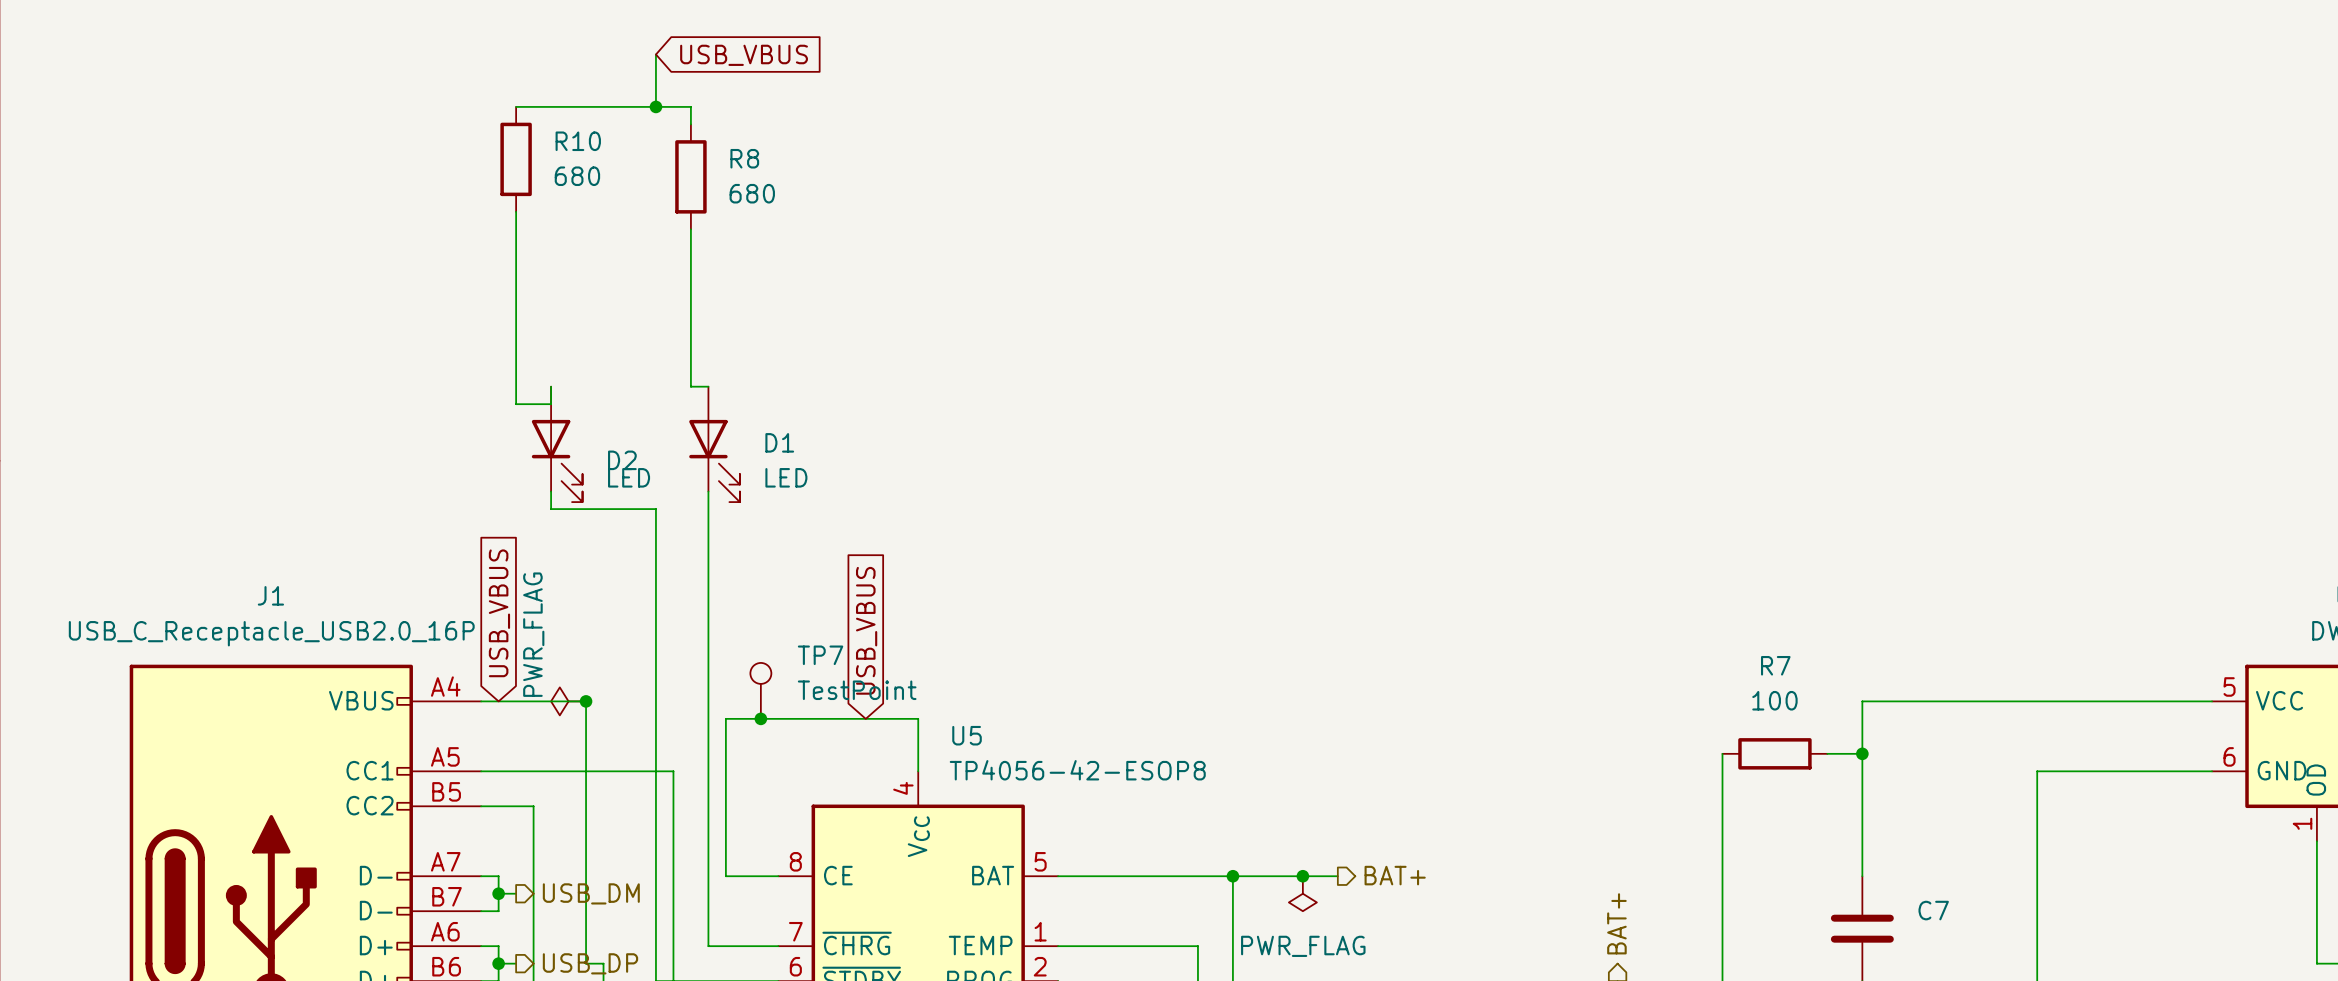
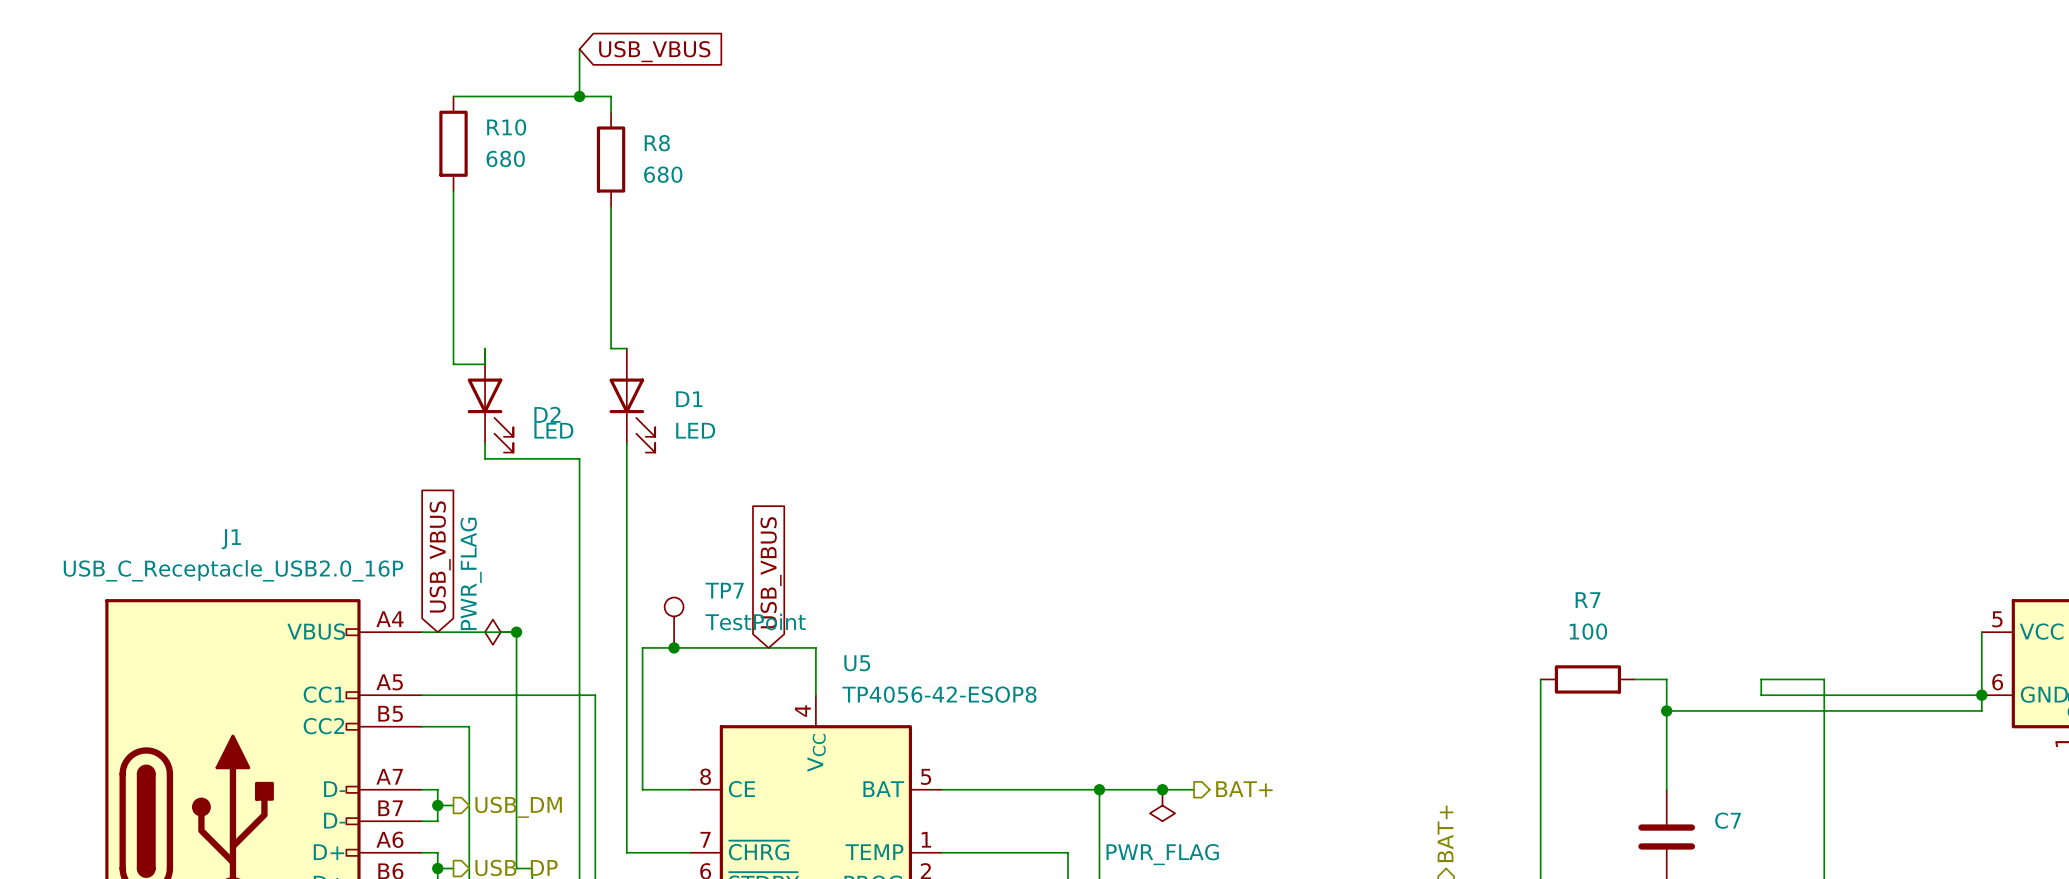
wire: (2212, 701) (1862, 701) (1862, 753) -> (1981, 632) (1981, 710) (1666, 710)
junction position: (1862, 753) -> (1666, 710)
wire: none -> (1761, 679) (1824, 679) (1824, 695) (1761, 695) (1761, 679)
junction: none -> (1981, 695)

